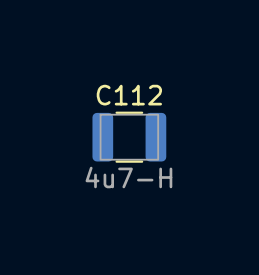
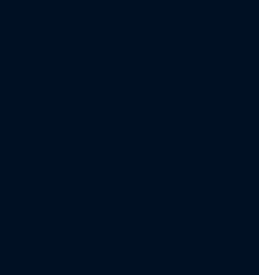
C112: 4u7-H (129, 137) -> none

